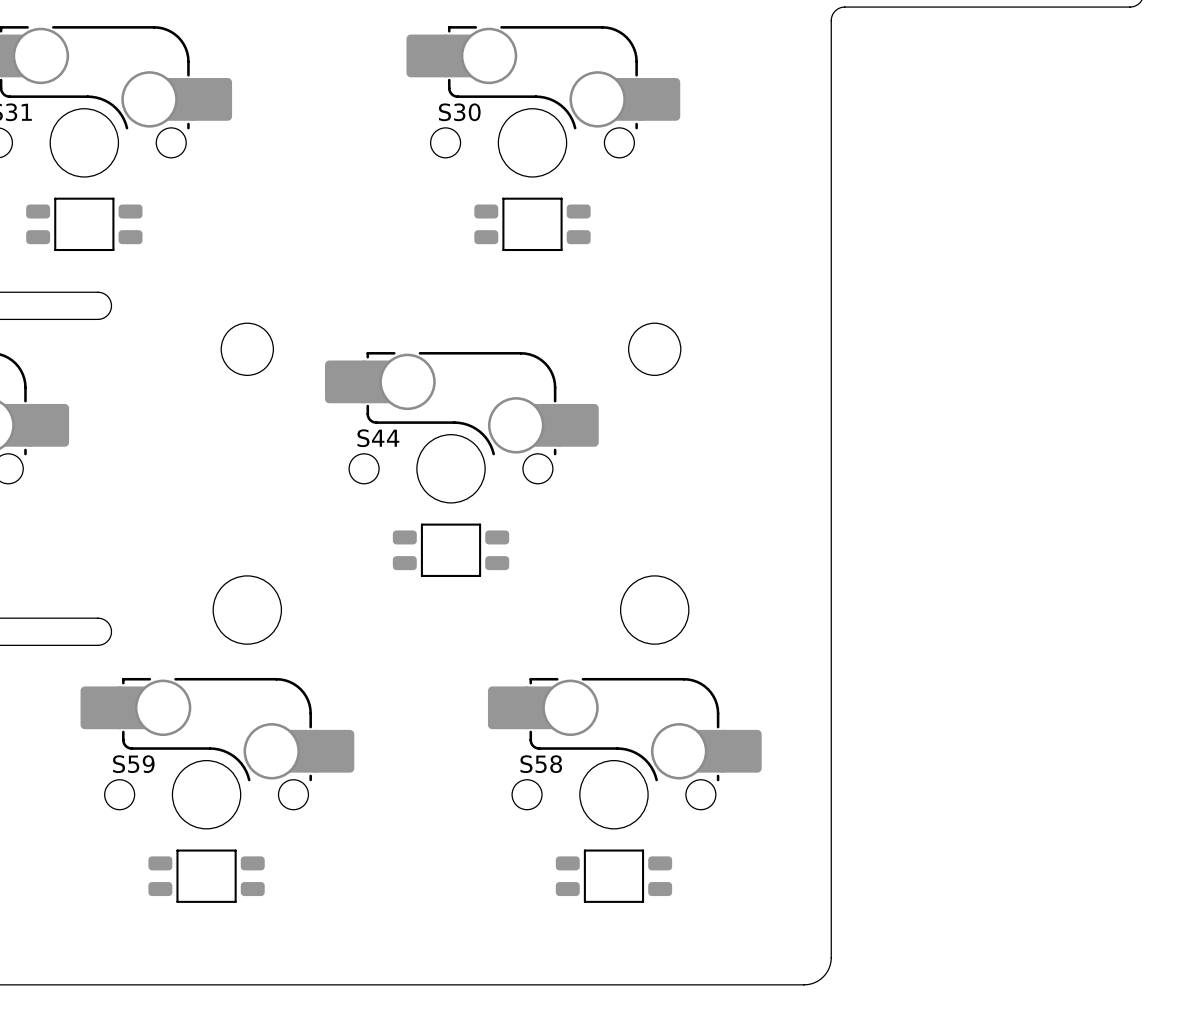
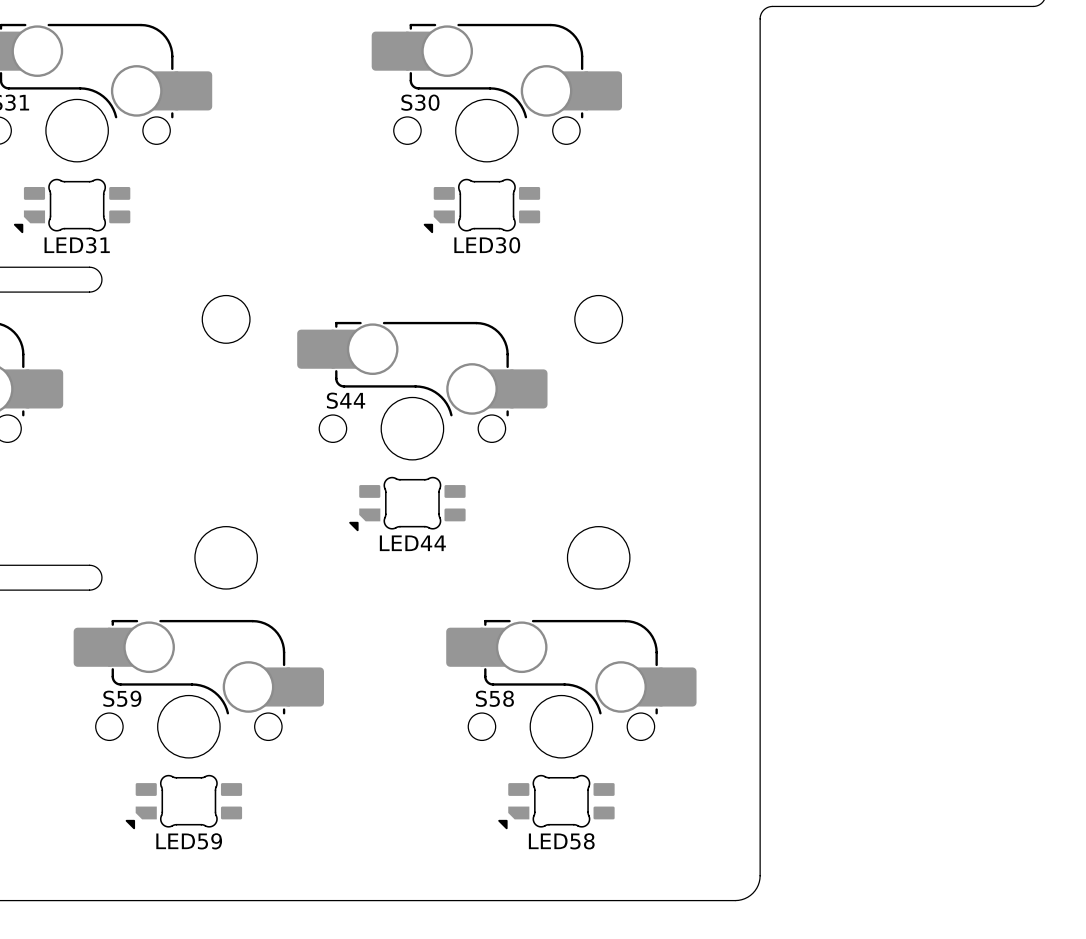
part: (84, 224) -> none
part: (532, 224) -> none
LED31: none -> (72, 205)
LED30: none -> (481, 205)
part: (451, 550) -> none
LED44: none -> (407, 504)
part: (206, 876) -> none
part: (613, 876) -> none
LED59: none -> (183, 802)
LED58: none -> (556, 802)

